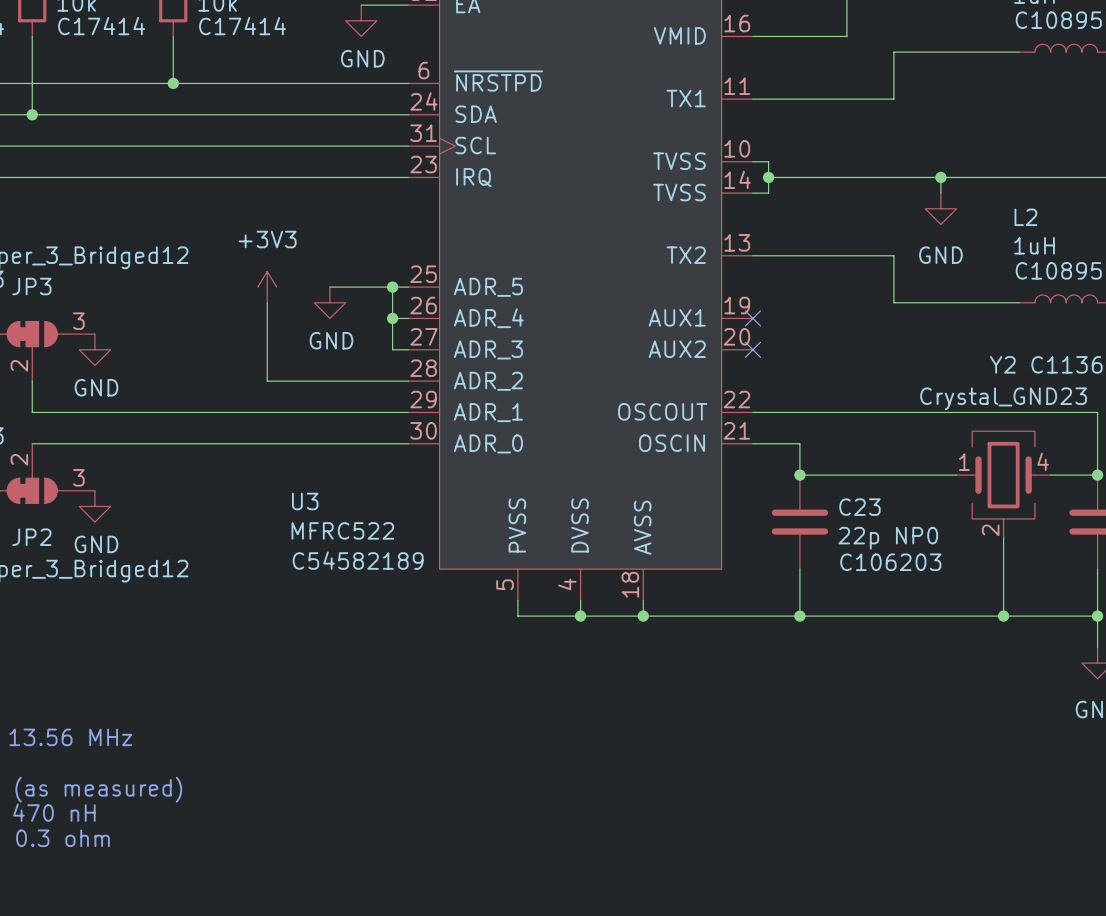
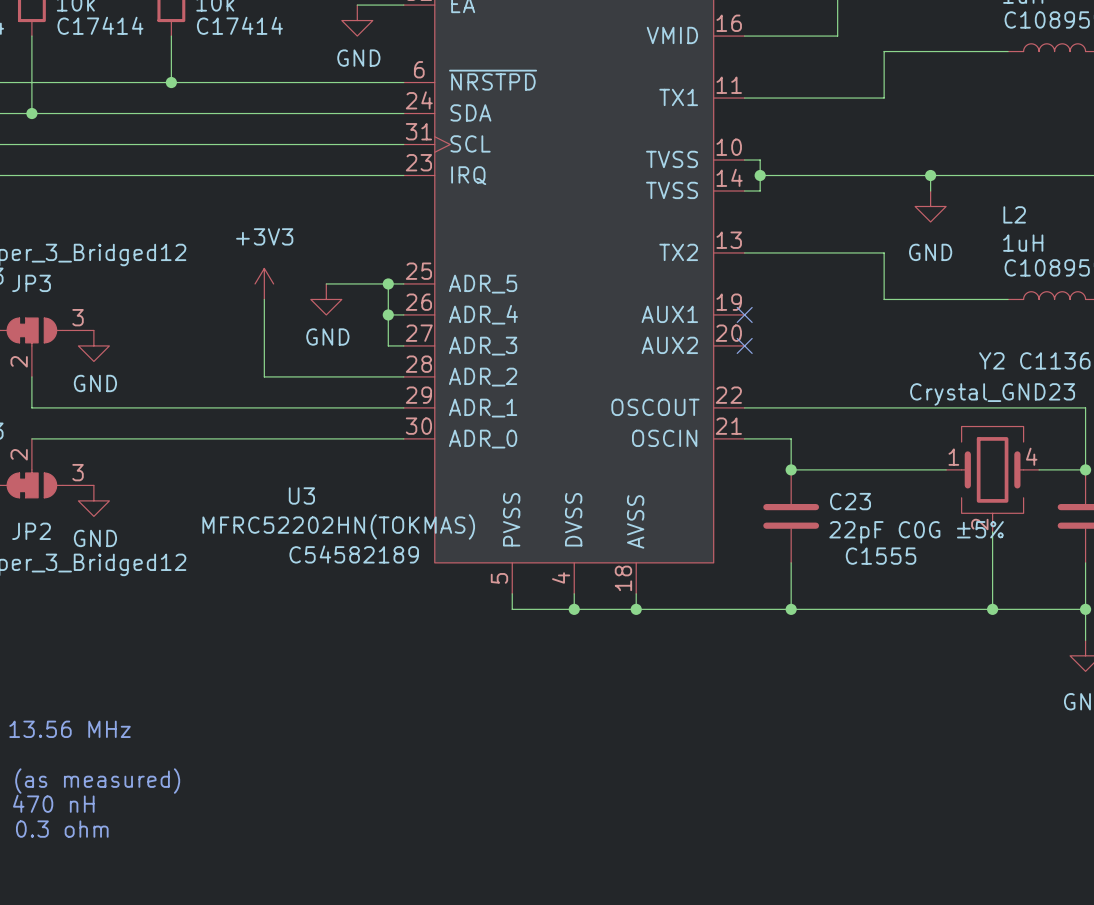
U3 value: MFRC522 (342, 530) -> MFRC52202HN(TOKMAS) (338, 526)
C23 value: 22p NP0 (888, 538) -> 22pF C0G ±5% (916, 532)
C23 text: C106203 (890, 562) -> C1555 (881, 556)

